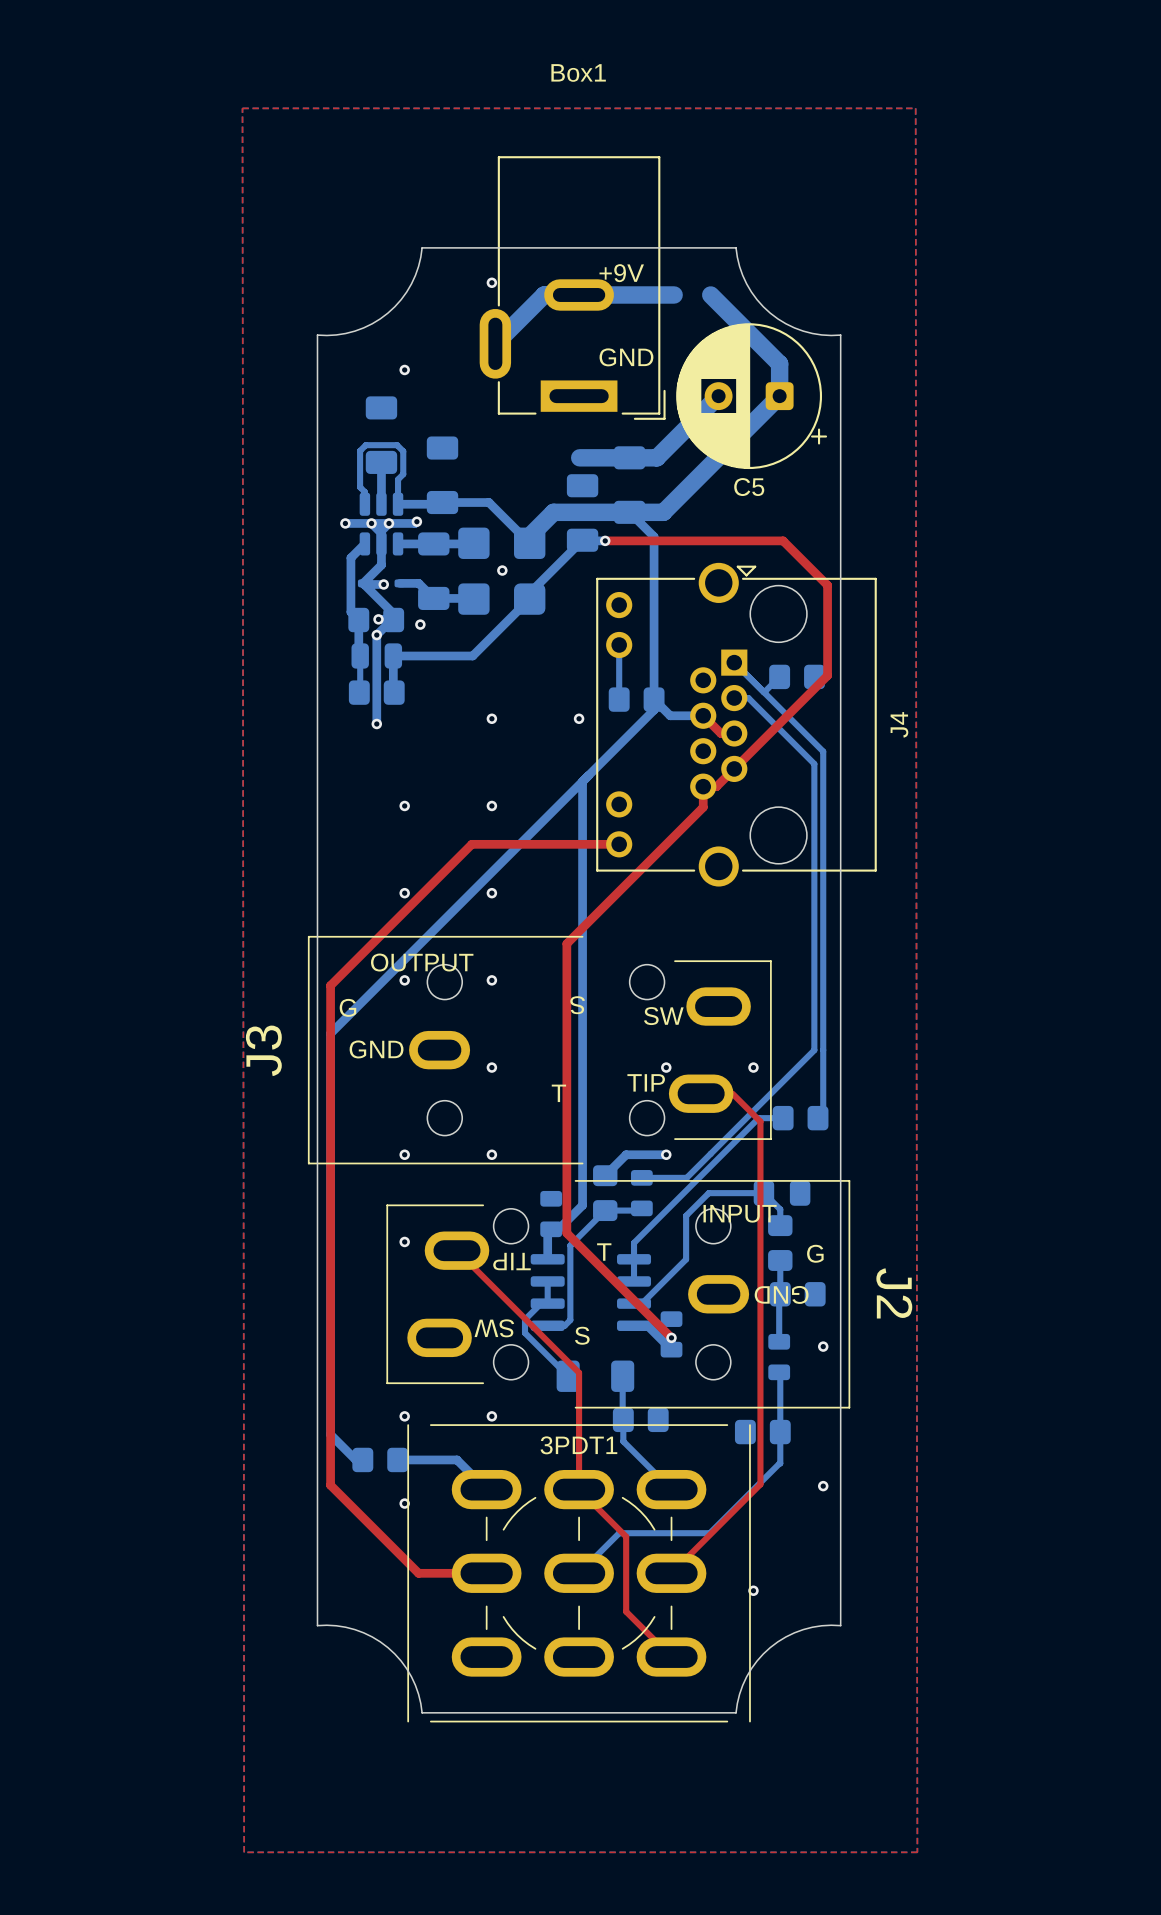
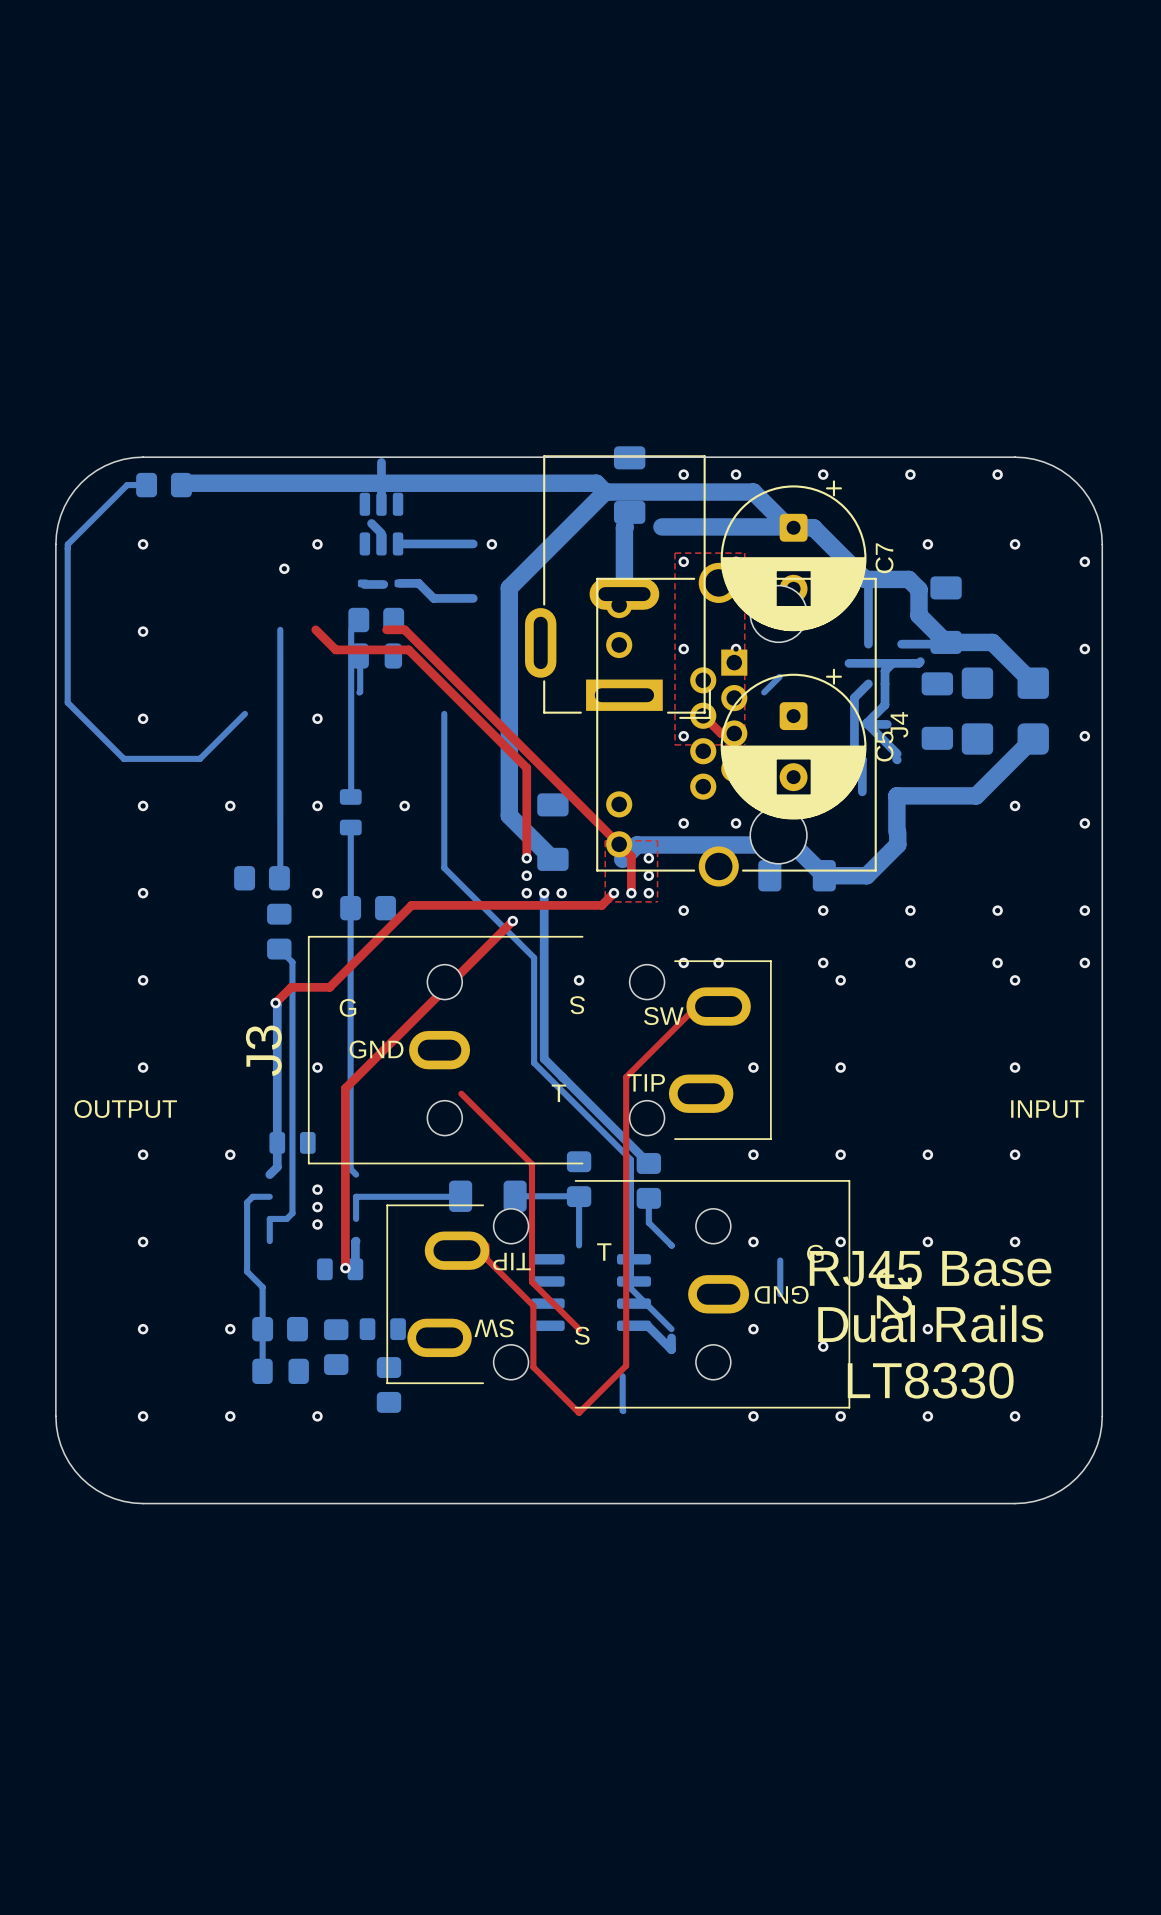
top zone outline: (242, 108) (915, 108) (917, 1852) (244, 1852) (242, 108) -> none
board edge: (422, 247) (736, 247) (739, 266) (746, 283) (757, 299) (770, 313) (785, 323) (803, 331) (821, 334) (840, 335) (840, 1625) (821, 1625) (803, 1629) (785, 1636) (770, 1647) (757, 1661) (746, 1676) (739, 1694) (736, 1712) (422, 1712) (418, 1694) (411, 1676) (401, 1661) (387, 1647) (372, 1636) (354, 1629) (336, 1625) (317, 1625) (317, 335) (336, 334) (354, 331) (372, 323) (387, 313) (401, 299) (411, 283) (418, 266) (422, 247) -> none
text: +9V (621, 273) -> none
via: (491, 282) -> none
part position: (572, 288) -> (617, 587)
bottom track: (674, 294) (544, 294) (495, 343) -> none
bottom track: (710, 294) (779, 363) (779, 396) (663, 512) (553, 512) (529, 536) (529, 543) (488, 502) (442, 502) -> none
text: GND (626, 357) -> none
via: (404, 369) -> none
bottom track: (718, 396) (656, 457) (579, 457) -> none
C5 rotation: 0° (751, 396) -> 90° counterclockwise (793, 744)
C5 position: (751, 396) -> (793, 744)
part: (381, 435) -> none
board edge: none -> (143, 457) (1015, 457) (1043, 462) (1061, 470) (1076, 482) (1088, 497) (1097, 515) (1102, 544) (1102, 1416) (1097, 1445) (1088, 1462) (1076, 1478) (1061, 1490) (1043, 1498) (1015, 1503) (143, 1503) (123, 1501) (105, 1494) (81, 1478) (69, 1462) (60, 1445) (55, 1416) (56, 534) (64, 506) (81, 482) (96, 470) (114, 462) (143, 457)
via: none -> (683, 474)
via: none -> (736, 474)
via: none -> (823, 474)
via: none -> (910, 474)
via: none -> (997, 474)
part: (442, 475) -> none
bottom track: none -> (146, 485) (127, 485) (67, 544) (67, 702) (123, 758) (199, 758) (244, 713)
part: none -> (164, 485)
bottom track: none -> (181, 485) (183, 483) (596, 483) (605, 492)
bottom track: none -> (605, 492) (753, 492) (789, 527) (813, 527) (865, 579)
bottom track: none -> (605, 492) (509, 587) (509, 815) (552, 859)
bottom track: (364, 504) (364, 492) (360, 487) (360, 450) (365, 445) (397, 445) (403, 451) (403, 474) (398, 479) (398, 504) (440, 504) -> none
part: (582, 512) -> none
bottom track: (629, 512) (654, 536) (654, 710) (330, 1033) (330, 1434) (355, 1459) (362, 1459) -> none
bottom track: (416, 521) (415, 523) (345, 523) -> none
via: (416, 521) -> none
via: (345, 523) -> none
via: (371, 523) -> none
bottom track: (388, 523) (381, 530) (381, 565) (363, 583) (393, 613) -> none
via: (388, 523) -> none
bottom track: none -> (625, 526) (624, 594)
bottom track: none -> (661, 526) (793, 527)
bottom track: (605, 540) (582, 540) (529, 593) (529, 599) -> none
top track: (605, 540) (783, 540) (827, 585) (827, 675) (716, 786) (703, 786) (703, 807) (566, 943) (566, 1233) (671, 1337) -> none
via: (605, 540) -> none
bottom track: (364, 543) (350, 557) (350, 612) (358, 620) (358, 651) -> none
via: none -> (143, 544)
via: none -> (317, 544)
via: none -> (927, 544)
via: none -> (1015, 544)
top zone outline: none -> (675, 553) (675, 744) (744, 744) (744, 553) (675, 553)
C7: none -> (793, 555)
via: none -> (683, 561)
via: none -> (1084, 561)
via: none -> (284, 568)
via position: (502, 570) -> (491, 544)
part: (433, 571) -> none
part: (501, 571) -> none
via: (383, 584) -> none
bottom track: (529, 599) (472, 655) (393, 655) (394, 692) -> none
part: none -> (946, 615)
via: (378, 619) -> none
bottom track: (391, 620) (376, 635) (376, 724) -> none
via: (420, 624) -> none
bottom track: none -> (280, 629) (280, 877)
top track: none -> (315, 629) (335, 649) (408, 649) (526, 767) (526, 858)
bottom track: none -> (351, 629) (350, 796)
top track: none -> (386, 629) (404, 629) (631, 856) (631, 893)
via: none -> (143, 631)
via: (376, 635) -> none
bottom track: none -> (868, 644) (868, 582) (865, 579) (908, 579) (919, 589) (919, 615) (946, 642) (992, 642) (1033, 683)
bottom track: none -> (901, 644) (944, 644)
bottom track: (619, 645) (619, 699) -> none
via: none -> (683, 649)
via: none -> (736, 649)
via: none -> (1084, 649)
bottom track: none -> (920, 661) (918, 663) (848, 663)
bottom track: (734, 662) (823, 751) (823, 1112) (818, 1118) -> none
bottom track: none -> (892, 663) (885, 670) (885, 704) (866, 723) (897, 753)
part: (797, 676) -> none
bottom track: none -> (868, 683) (854, 697) (854, 752) (862, 759) (862, 791)
part: (376, 692) -> none
bottom track: (734, 698) (748, 698) (814, 763) (814, 1050) (686, 1177) (641, 1177) -> none
part: (636, 699) -> none
bottom track: (654, 699) (670, 715) (703, 715) -> none
part: none -> (937, 711)
part: none -> (1005, 711)
bottom track: none -> (444, 713) (444, 868) (534, 957) (534, 1063) (630, 1159) (630, 1288) (671, 1329)
via: none -> (143, 718)
via: none -> (317, 718)
via: (491, 718) -> none
via: (579, 718) -> none
via: (376, 724) -> none
bottom track: none -> (867, 724) (887, 724)
via: none -> (683, 736)
via: none -> (1084, 736)
bottom track: none -> (1033, 739) (976, 795) (896, 795) (897, 844) (866, 875) (824, 875) (793, 844) (637, 844) (622, 859)
bottom track: none -> (896, 759) (897, 759)
bottom track: (582, 781) (582, 1205) (558, 1229) (551, 1229) -> none
via: none -> (143, 805)
via: none -> (230, 805)
via: none -> (317, 805)
via: (491, 805) -> none
via: none -> (1015, 805)
part: none -> (350, 812)
via: none -> (683, 823)
via: none -> (736, 823)
via: none -> (1084, 823)
bottom track: none -> (350, 827) (350, 907)
part: none -> (552, 832)
top zone outline: none -> (605, 840) (657, 840) (657, 901) (605, 901) (605, 840)
top track: (619, 844) (471, 844) (330, 985) (330, 1485) (418, 1573) (486, 1573) -> none
via: none -> (526, 858)
via: none -> (648, 858)
via: none -> (526, 875)
via: none -> (648, 875)
part: none -> (797, 875)
part: none -> (262, 878)
via: none -> (143, 893)
via: none -> (317, 893)
via: (404, 893) -> none
via: (491, 893) -> none
via: none -> (526, 893)
bottom track: none -> (544, 893) (544, 1058) (648, 1163)
via: none -> (544, 893)
via: none -> (561, 893)
top track: none -> (613, 893) (601, 905) (411, 905) (329, 987) (291, 987) (275, 1003)
via: none -> (613, 893)
via: none -> (631, 893)
via: none -> (648, 893)
bottom track: none -> (350, 908) (350, 1169) (356, 1174)
part: none -> (368, 908)
via: none -> (683, 910)
via: none -> (823, 910)
via: none -> (910, 910)
via: none -> (997, 910)
via: none -> (1084, 910)
top track: none -> (512, 921) (345, 1088) (345, 1268)
via: none -> (512, 921)
part: none -> (279, 931)
bottom track: none -> (279, 949) (292, 962) (292, 1213) (286, 1218) (269, 1218) (269, 1241)
text position: OUTPUT (422, 962) -> OUTPUT (125, 1109)
via: none -> (683, 962)
via: none -> (718, 962)
via: none -> (823, 962)
via: none -> (910, 962)
via: none -> (997, 962)
via: none -> (1084, 962)
via: none -> (143, 980)
via: (404, 980) -> none
via: (491, 980) -> none
via: none -> (579, 980)
via: none -> (840, 980)
via: none -> (1015, 980)
bottom track: none -> (275, 1003) (277, 1004) (277, 1167) (269, 1174)
via: none -> (275, 1003)
top track: none -> (696, 1006) (626, 1077) (626, 1365) (579, 1412) (533, 1367) (533, 1305) (486, 1259) (486, 1245)
via: none -> (143, 1067)
via: none -> (317, 1067)
via: (491, 1067) -> none
via: (666, 1067) -> none
via: none -> (840, 1067)
via: none -> (1015, 1067)
top track: none -> (461, 1093) (531, 1164) (531, 1282) (579, 1329)
top track: (732, 1093) (760, 1121) (760, 1484) (671, 1573) -> none
bottom track: (783, 1118) (758, 1118) (634, 1242) (634, 1281) -> none
part: (800, 1118) -> none
part: none -> (292, 1142)
via: none -> (143, 1154)
via: none -> (230, 1154)
via: (404, 1154) -> none
via: (491, 1154) -> none
bottom track: (666, 1154) (626, 1154) (605, 1175) -> none
via: (666, 1154) -> none
via: none -> (753, 1154)
via: none -> (840, 1154)
via: none -> (927, 1154)
via: none -> (1015, 1154)
part footprint: [630, 1170, 653, 1217] -> [636, 1153, 662, 1209]
via: none -> (317, 1189)
part position: (605, 1193) -> (579, 1179)
part: (782, 1193) -> none
bottom track: none -> (269, 1196) (252, 1196) (247, 1202) (247, 1271) (262, 1287) (262, 1371)
bottom track: none -> (460, 1196) (356, 1196) (356, 1218)
bottom track: none -> (515, 1196) (579, 1196) (579, 1245)
bottom track: none -> (648, 1198) (648, 1222) (671, 1245)
via: none -> (317, 1207)
bottom track: (641, 1208) (639, 1210) (605, 1210) (570, 1245) (570, 1320) (564, 1325) (547, 1325) -> none
text position: INPUT (740, 1213) -> INPUT (1047, 1109)
part: (551, 1214) -> none
via: none -> (317, 1224)
bottom track: (780, 1225) (780, 1209) (763, 1193) (708, 1193) (686, 1215) (686, 1259) (641, 1303) -> none
bottom track: (547, 1232) (547, 1259) -> none
via: none -> (143, 1241)
bottom track: none -> (356, 1241) (355, 1269) (345, 1268)
via: (404, 1241) -> none
via: none -> (753, 1241)
via: none -> (840, 1241)
via: none -> (927, 1241)
via: none -> (1015, 1241)
part: (780, 1243) -> none
top track: (457, 1250) (579, 1372) (579, 1489) (626, 1536) (626, 1611) (671, 1657) -> none
via: none -> (345, 1268)
text: none -> RJ45 Base (930, 1268)
part: none -> (340, 1269)
bottom track: (547, 1281) (547, 1303) -> none
part: (797, 1294) -> none
bottom track: (779, 1295) (779, 1341) -> none
bottom track: (541, 1303) (525, 1319) (525, 1333) (568, 1376) -> none
text: none -> Dual Rails (930, 1323)
via: none -> (143, 1329)
via: none -> (230, 1329)
part: none -> (280, 1329)
part: none -> (382, 1329)
via: none -> (753, 1329)
via: none -> (927, 1329)
part: (671, 1334) -> none
via: (671, 1337) -> none
part: none -> (336, 1347)
part: (779, 1357) -> none
part: none -> (280, 1371)
bottom track: (780, 1373) (780, 1463) (709, 1533) (619, 1533) (579, 1573) -> none
part position: (595, 1376) -> (487, 1196)
text: none -> LT8330 (930, 1380)
part: none -> (388, 1384)
via: none -> (143, 1416)
via: none -> (230, 1416)
via: none -> (317, 1416)
via: (404, 1416) -> none
via: (491, 1416) -> none
via: none -> (753, 1416)
via: none -> (840, 1416)
via: none -> (927, 1416)
via: none -> (1015, 1416)
bottom track: (623, 1419) (623, 1441) (671, 1489) -> none
part: (640, 1419) -> none
part: (762, 1432) -> none
part: (380, 1459) -> none
bottom track: (397, 1459) (457, 1459) (486, 1489) -> none
via: (823, 1486) -> none
via: (404, 1503) -> none
3PDT1: (579, 1573) -> none
via: (753, 1590) -> none
Box1: (579, 1858) -> none

